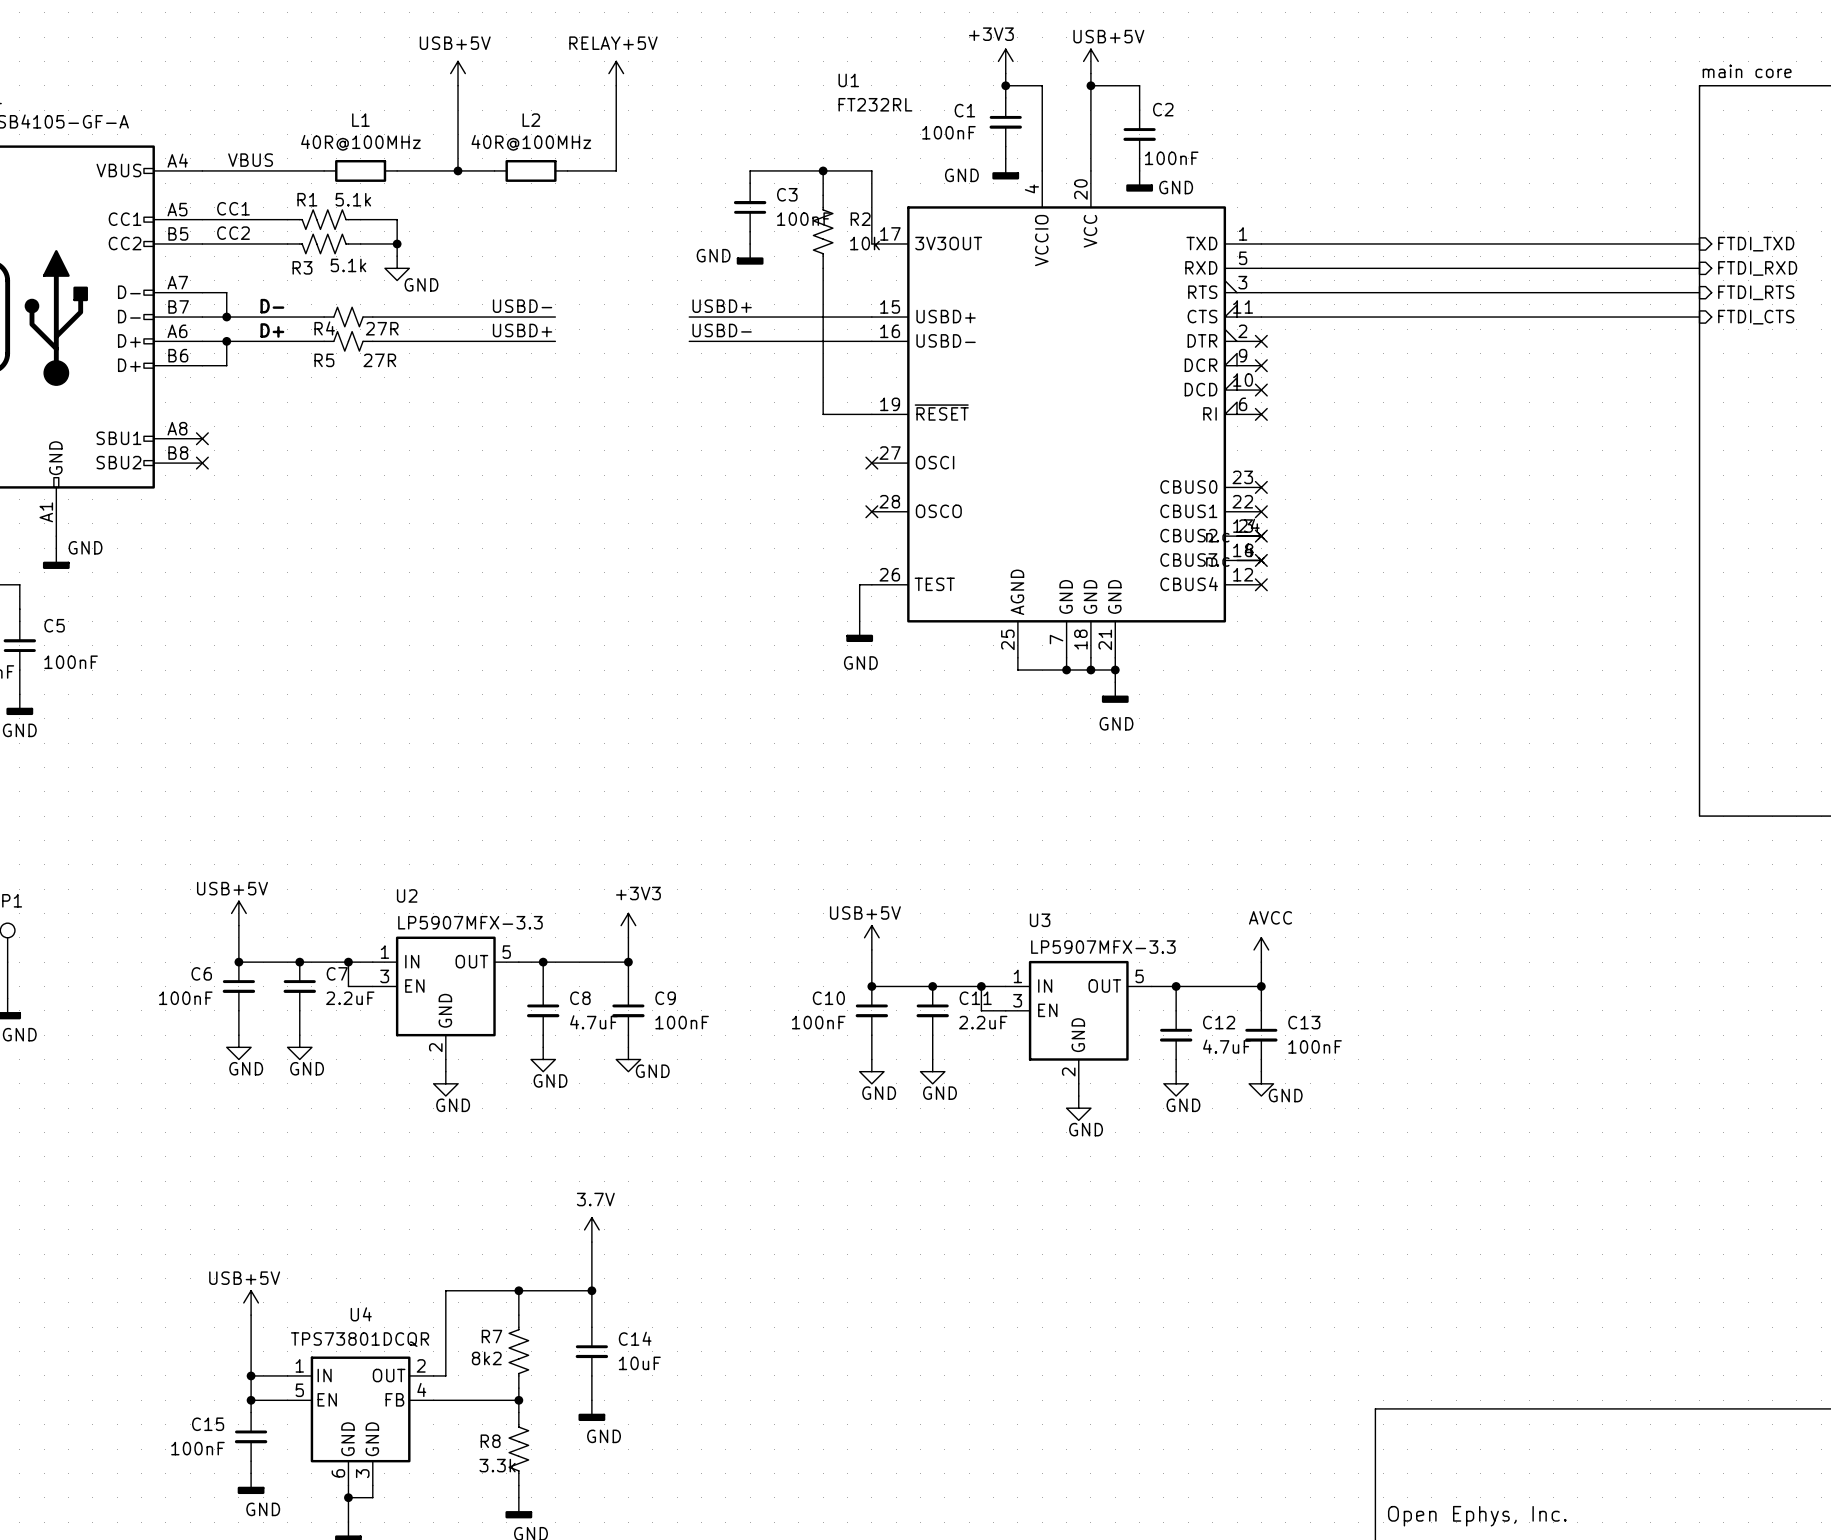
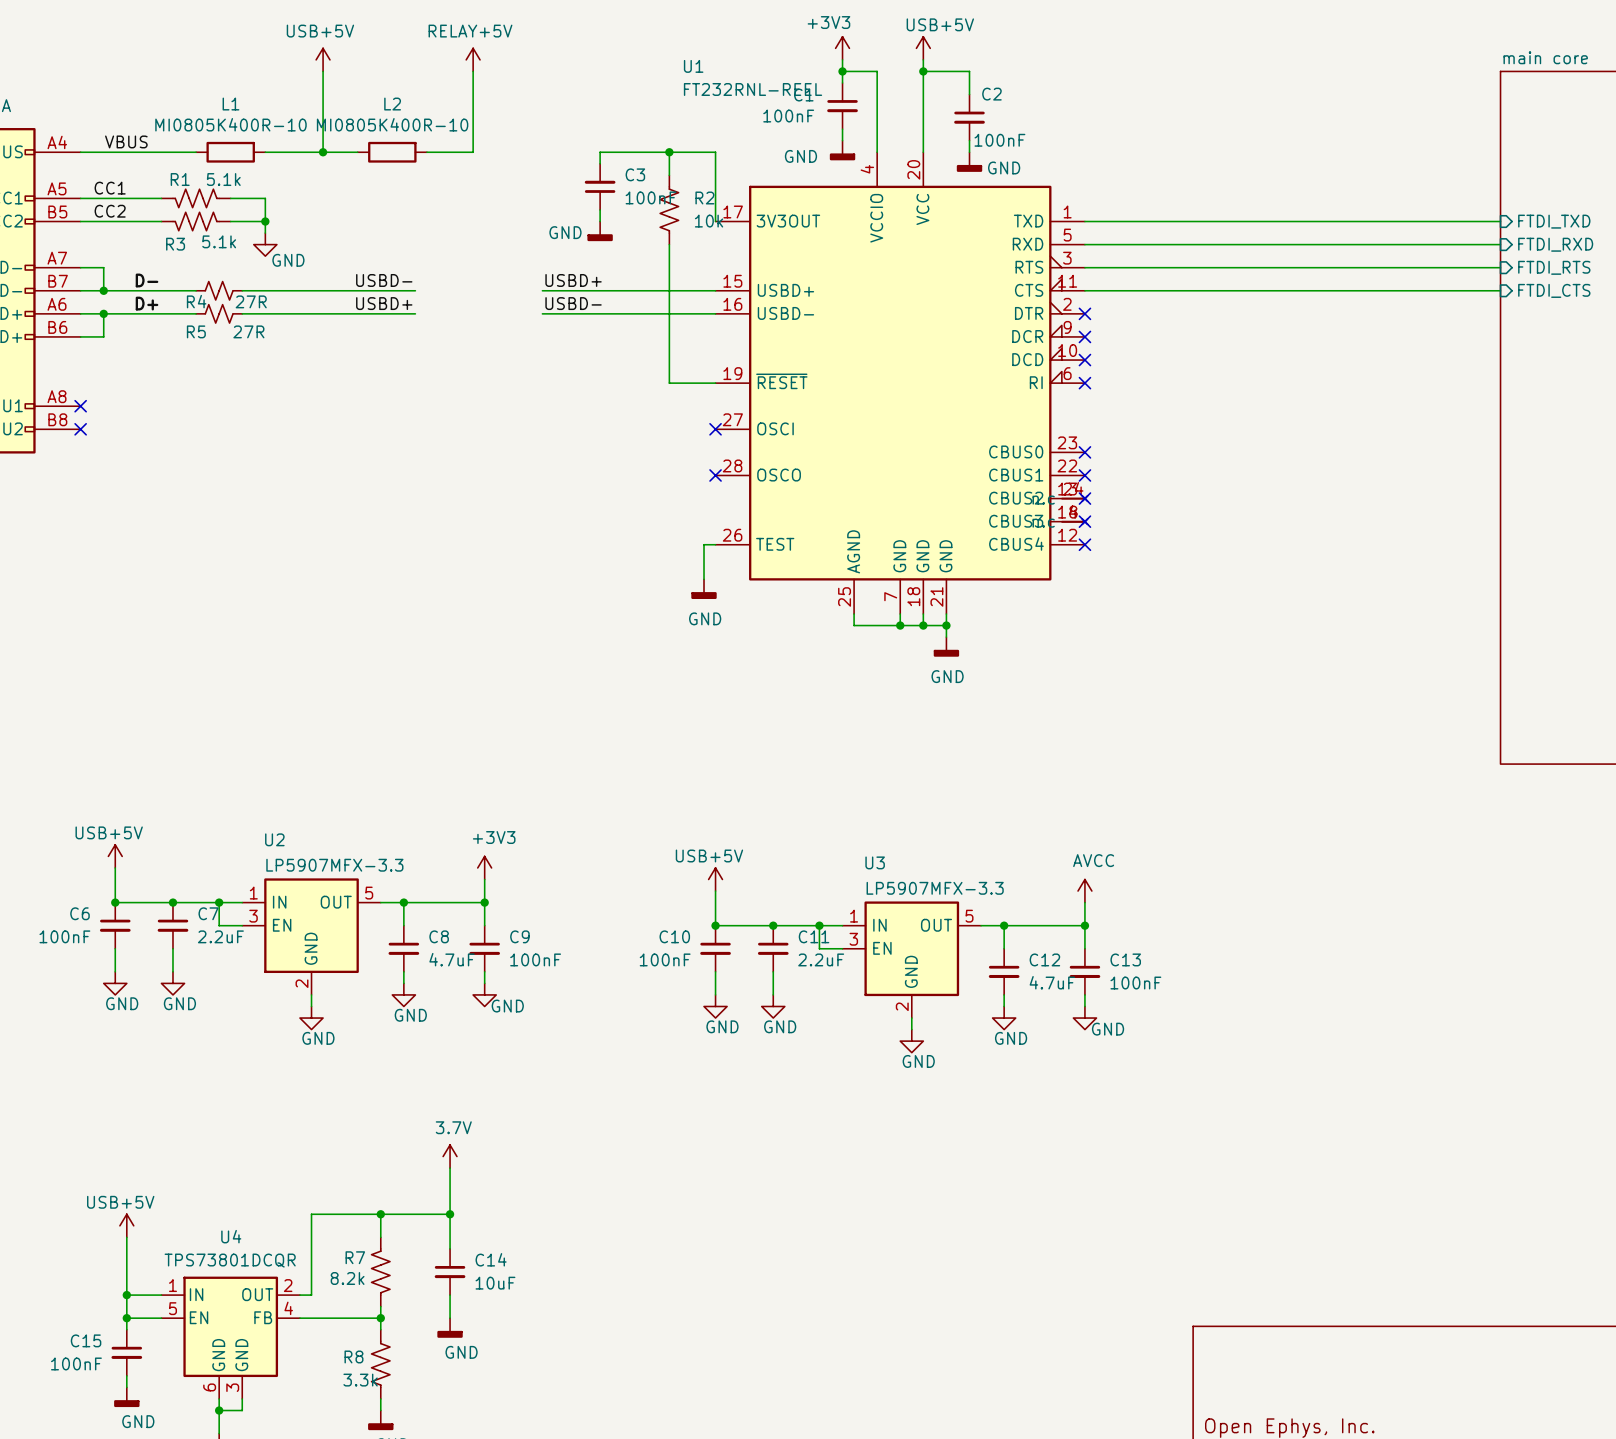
U1 value: FT232RL (875, 104) -> FT232RNL-REEL (753, 89)
L1 value: 40R@100MHz (360, 142) -> MI0805K400R-10 (230, 124)
L2 value: 40R@100MHz (531, 142) -> MI0805K400R-10 (392, 124)
R7 value: 8k2 (486, 1358) -> 8.2k (347, 1278)

